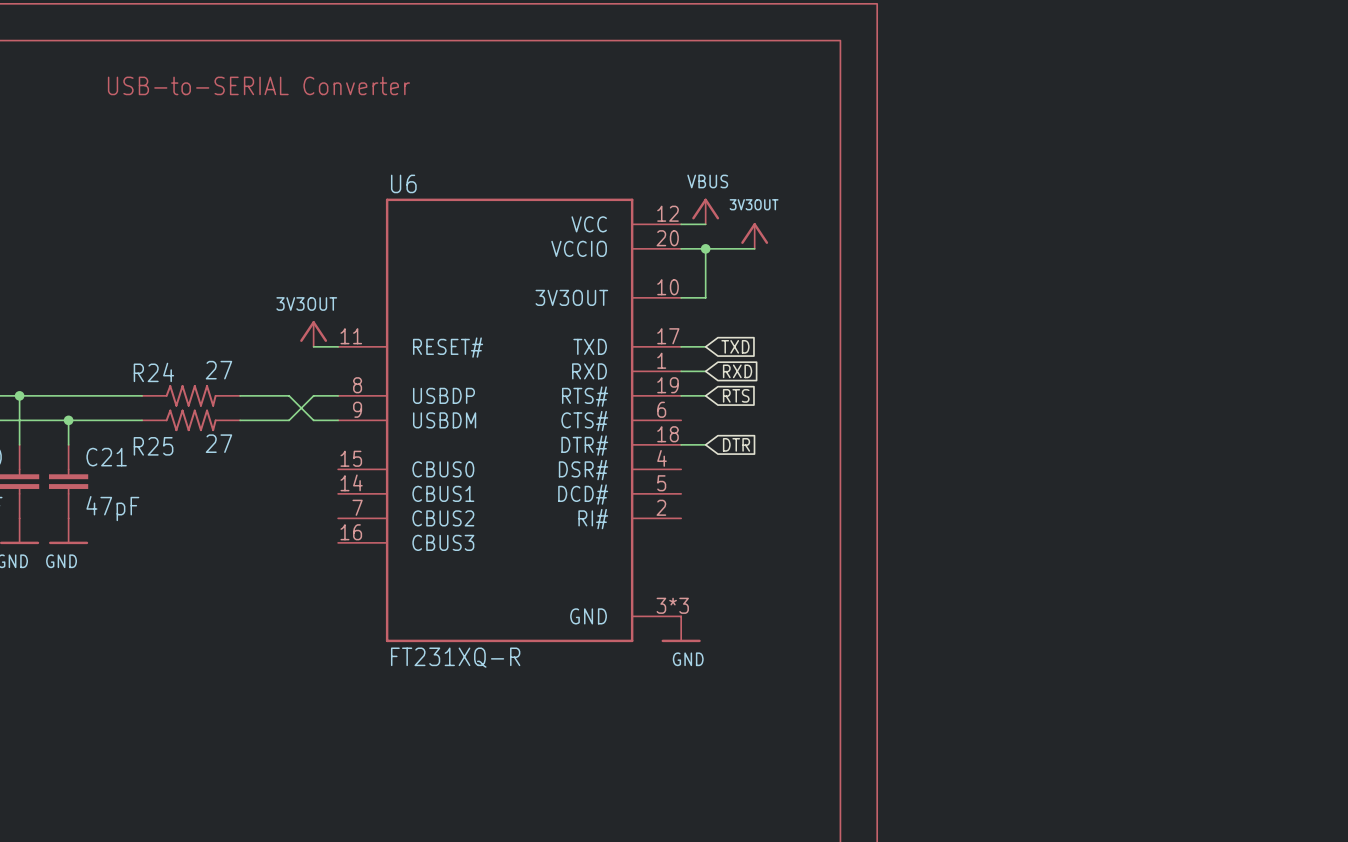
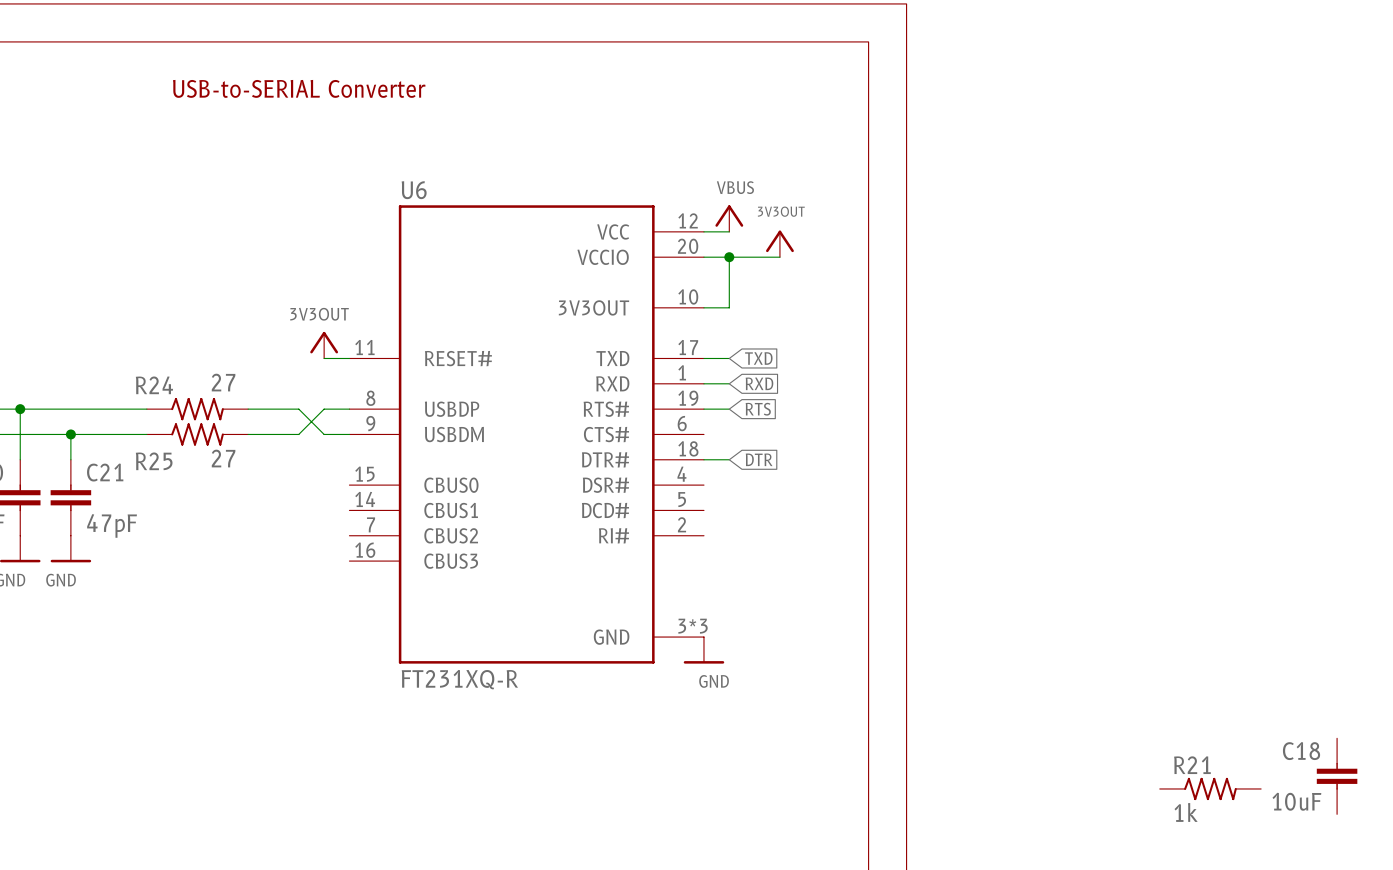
C18: none -> 10uF (1337, 776)
R21: none -> 1k (1210, 788)

